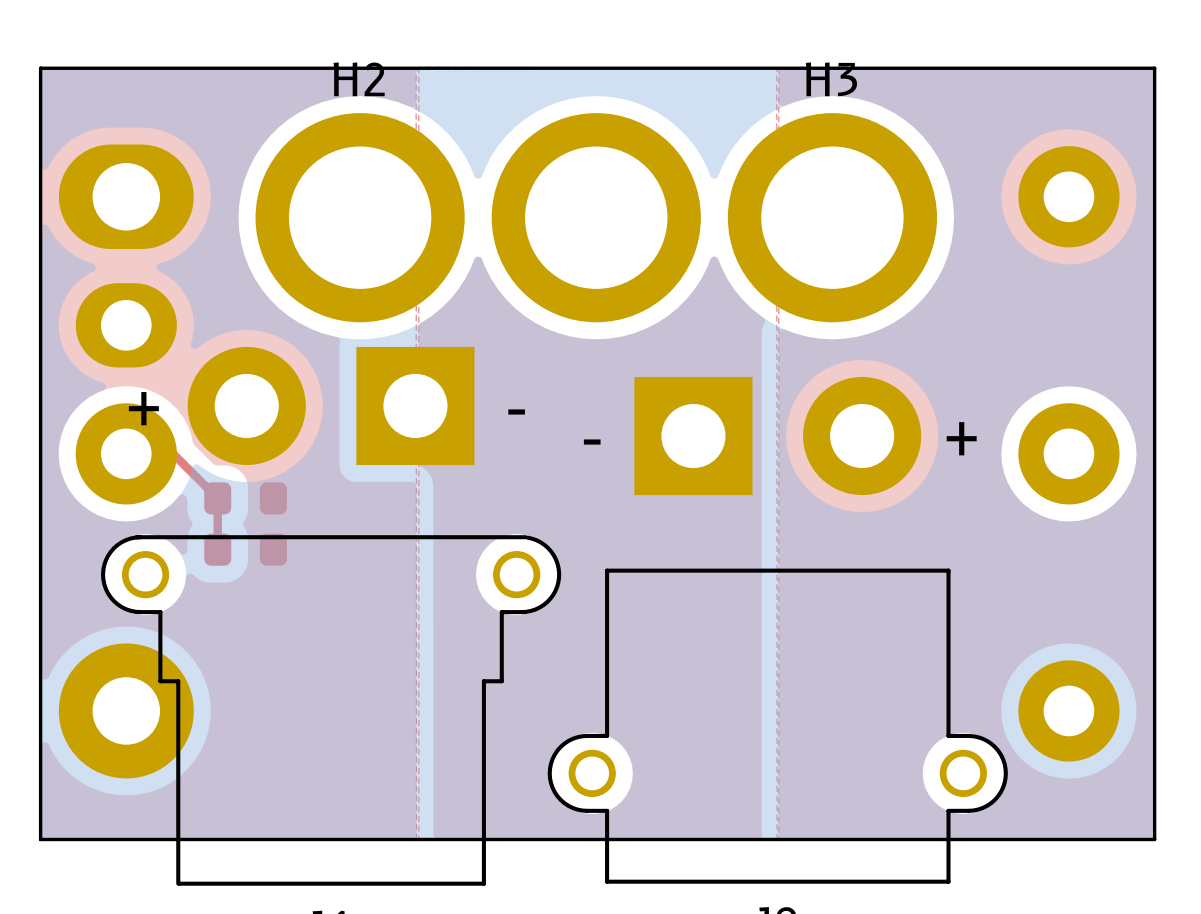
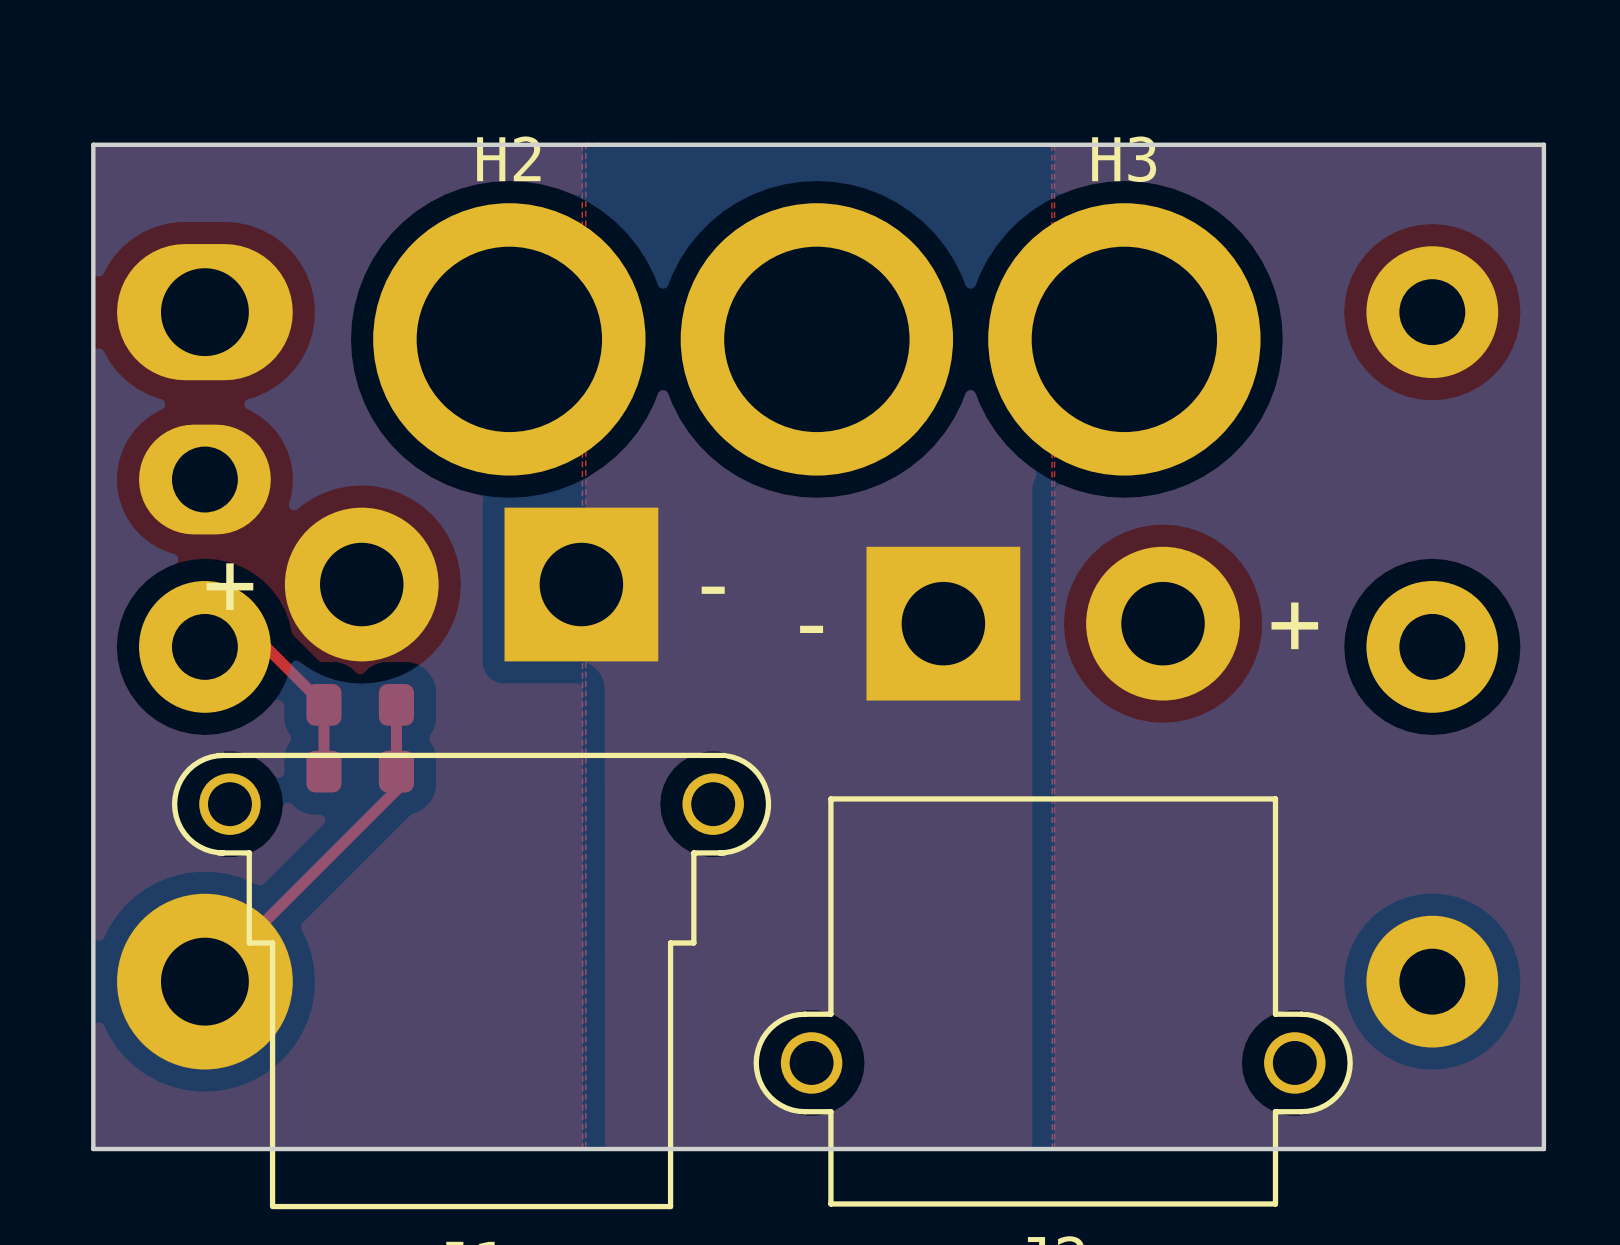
top track: none -> (396, 704) (396, 790) (204, 981)

